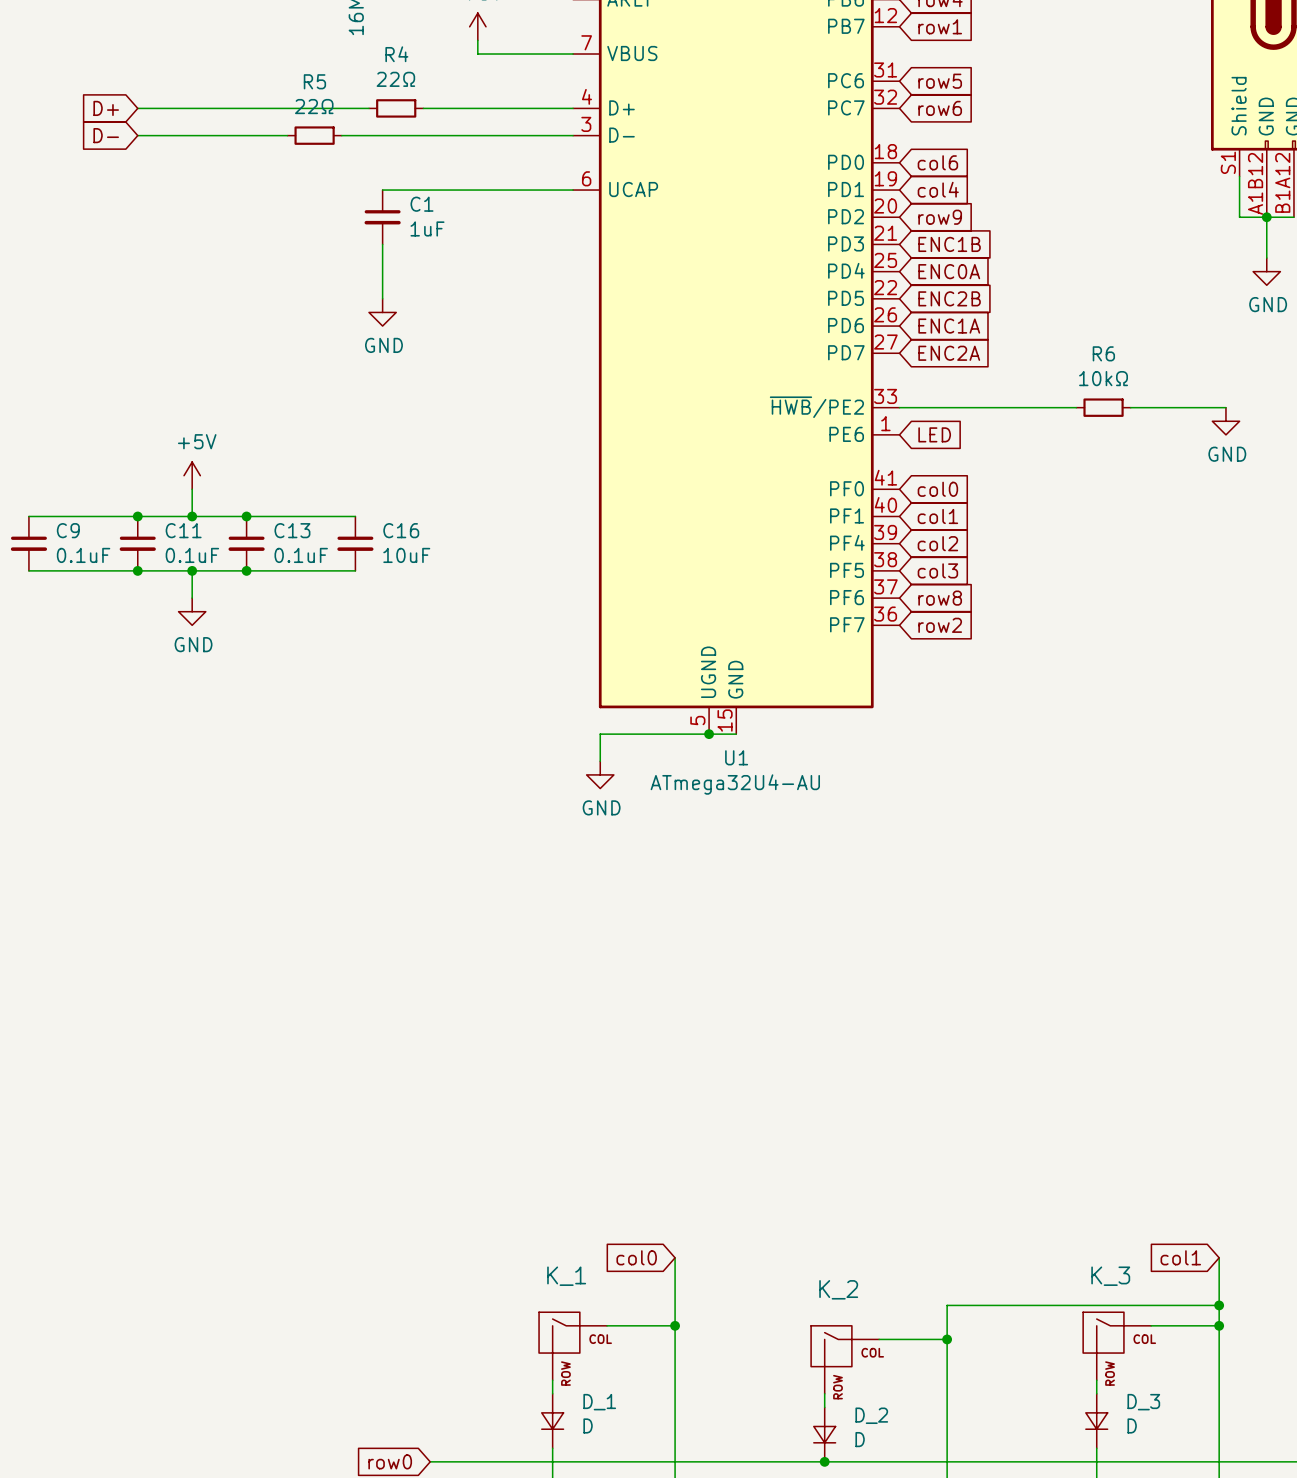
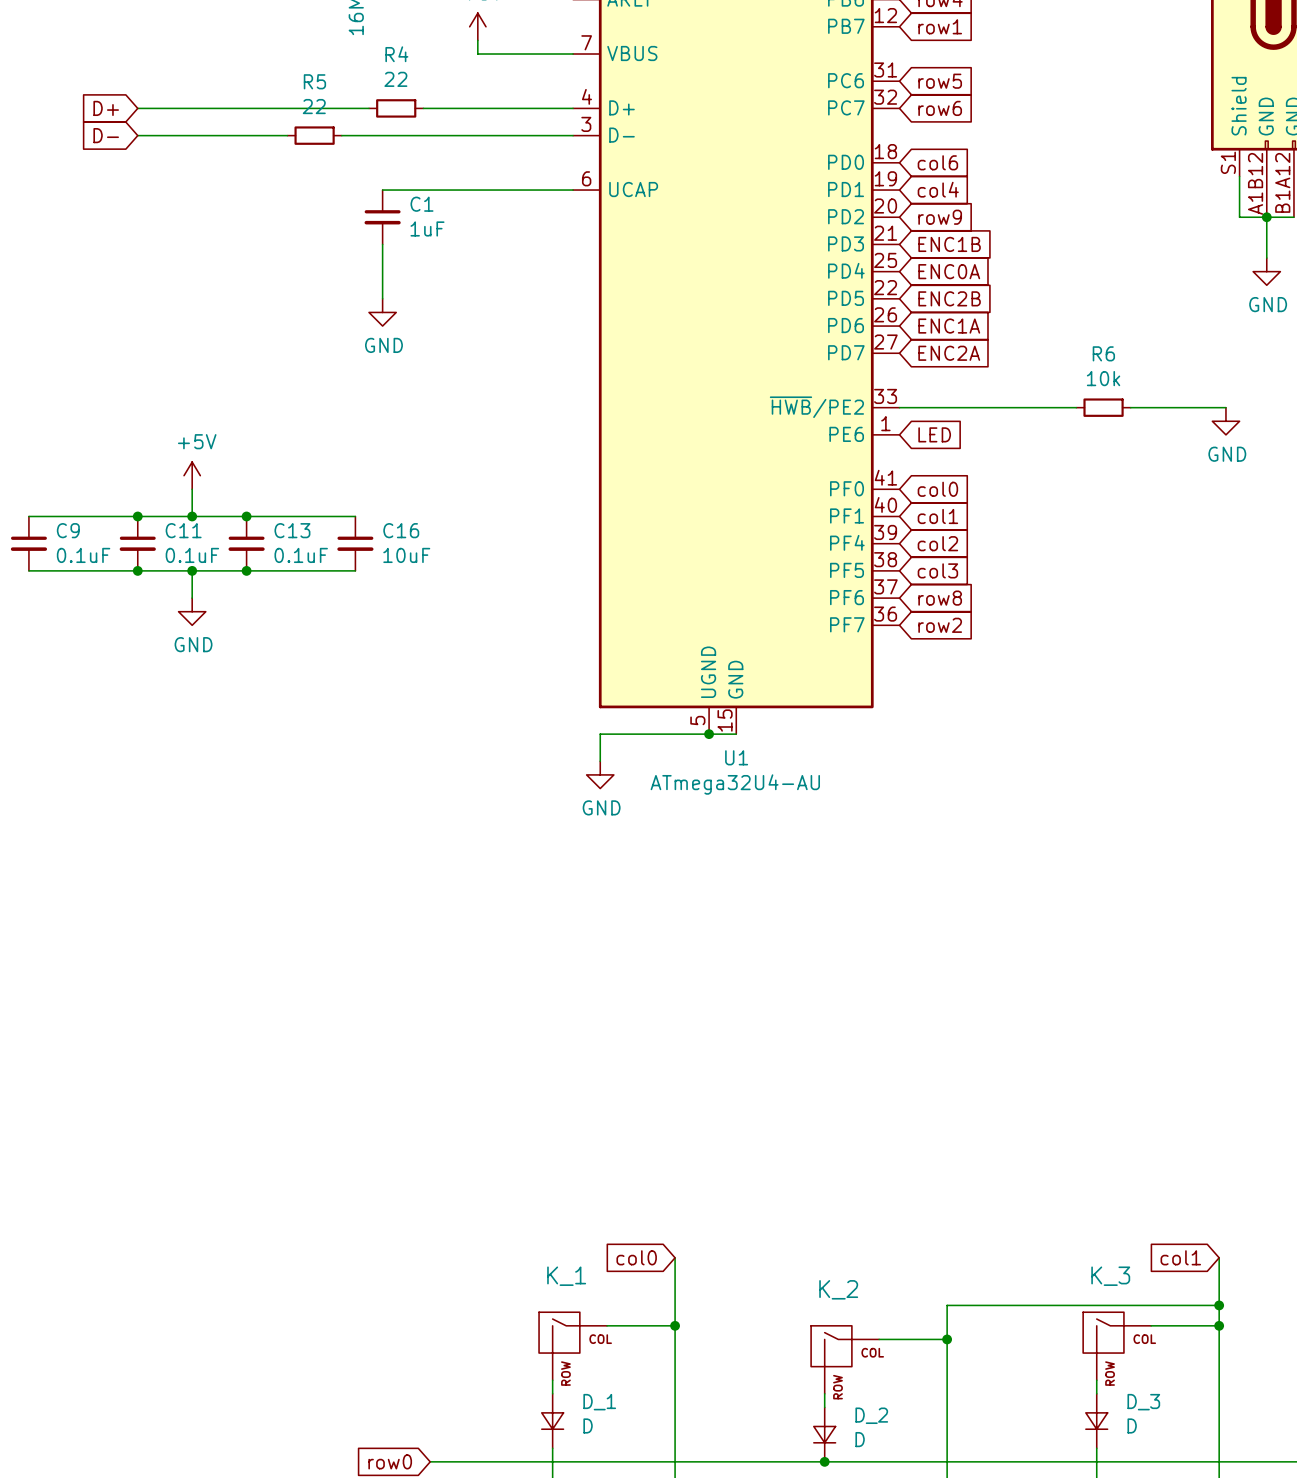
R4 value: 22Ω (395, 79) -> 22 (395, 79)
R5 value: 22Ω (314, 106) -> 22 (314, 106)
R6 value: 10kΩ (1103, 378) -> 10k (1103, 378)

